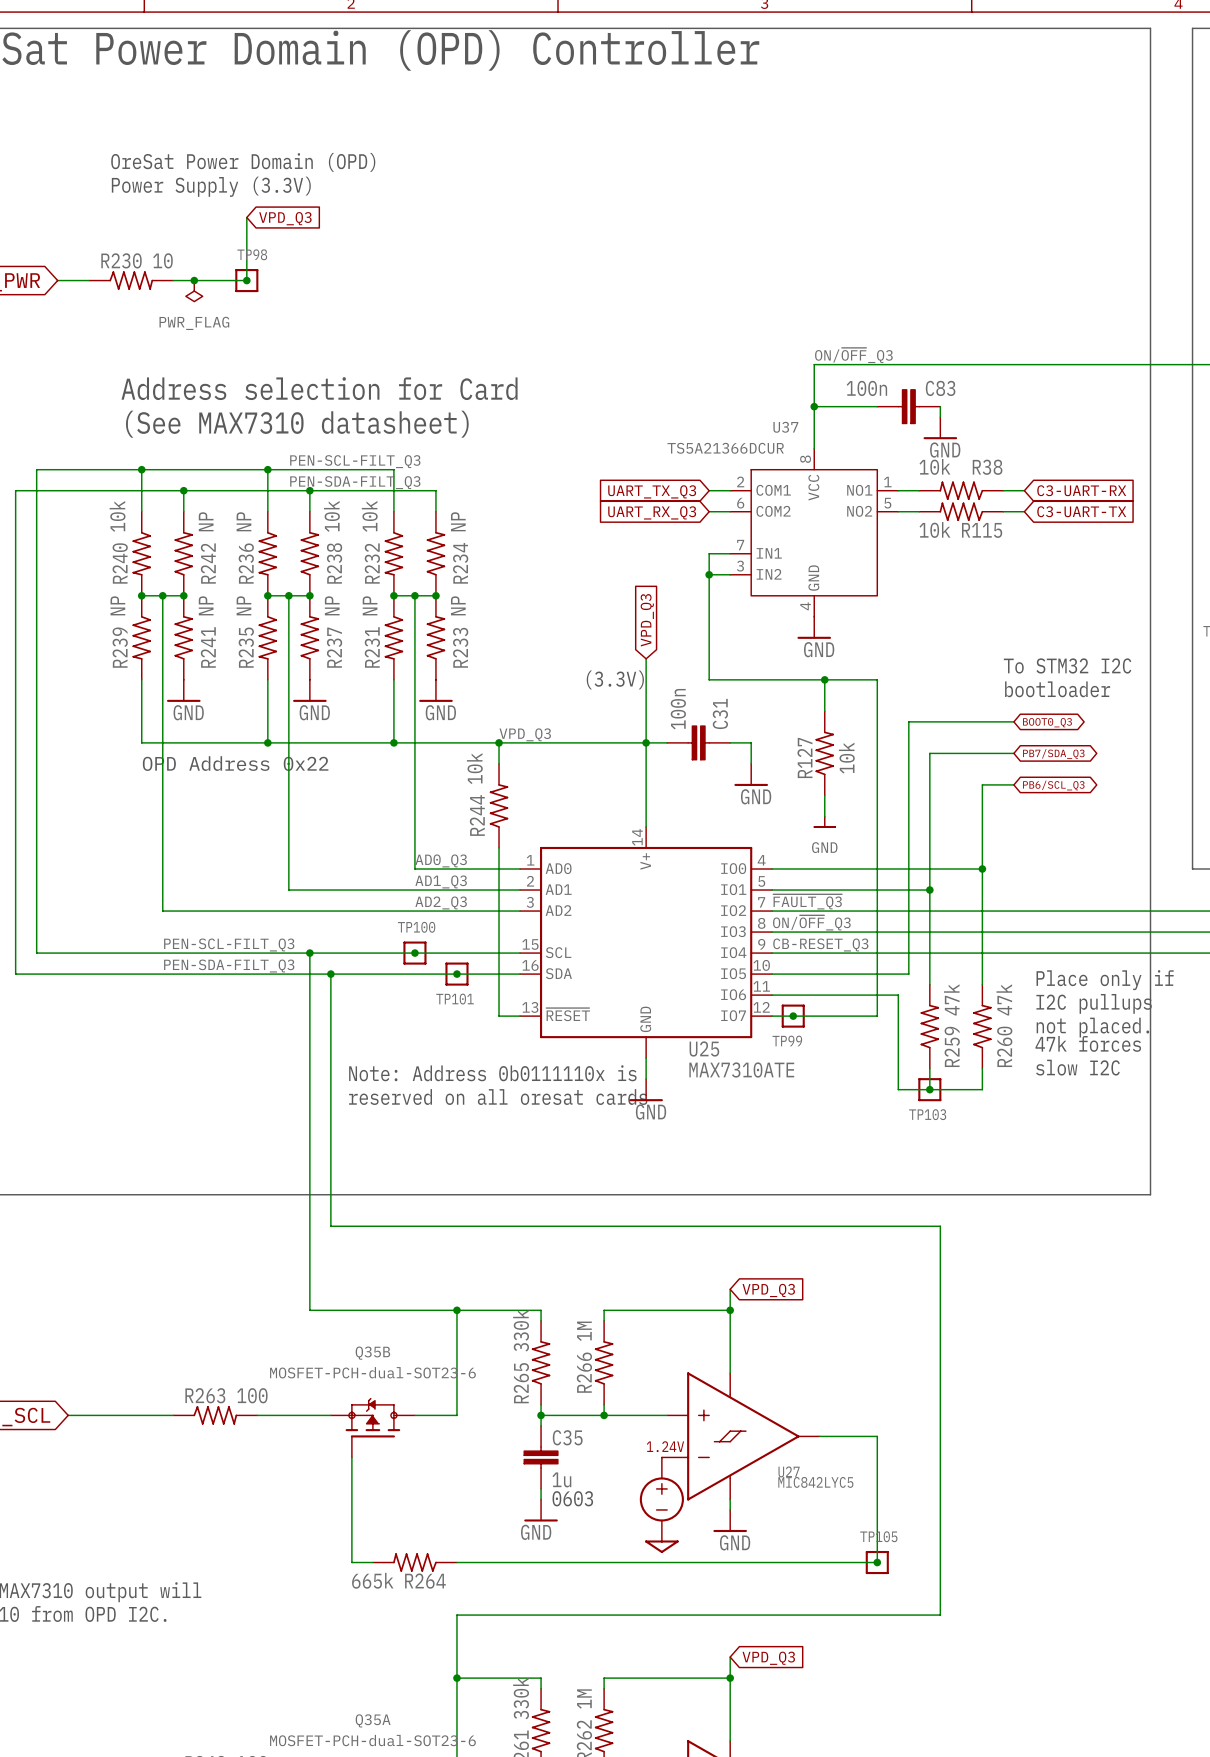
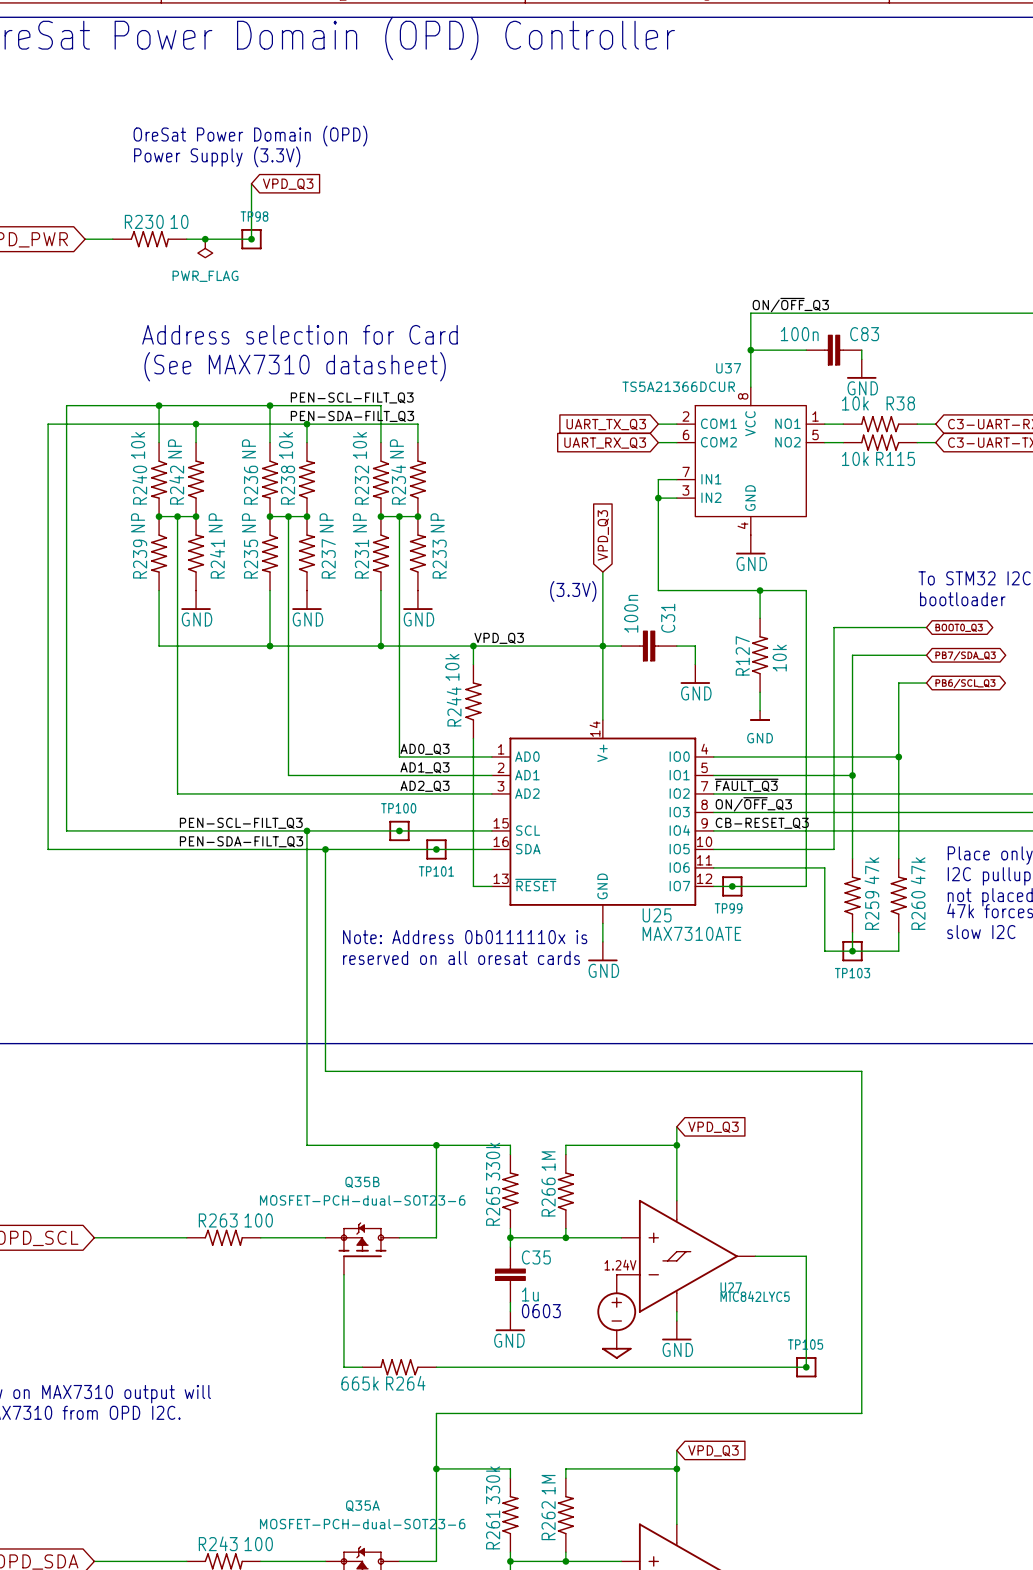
R238 value position: 10k (331, 516) -> 10k (285, 445)
R242 value position: NP (206, 521) -> NP (175, 448)
R234 value position: NP (458, 521) -> NP (396, 448)
R242 name position: R242 (208, 563) -> R242 (176, 485)
R238 name position: R238 (334, 563) -> R238 (288, 485)
R234 name position: R234 (460, 563) -> R234 (398, 484)
text: OPD Address 0x22 (235, 763) -> none

